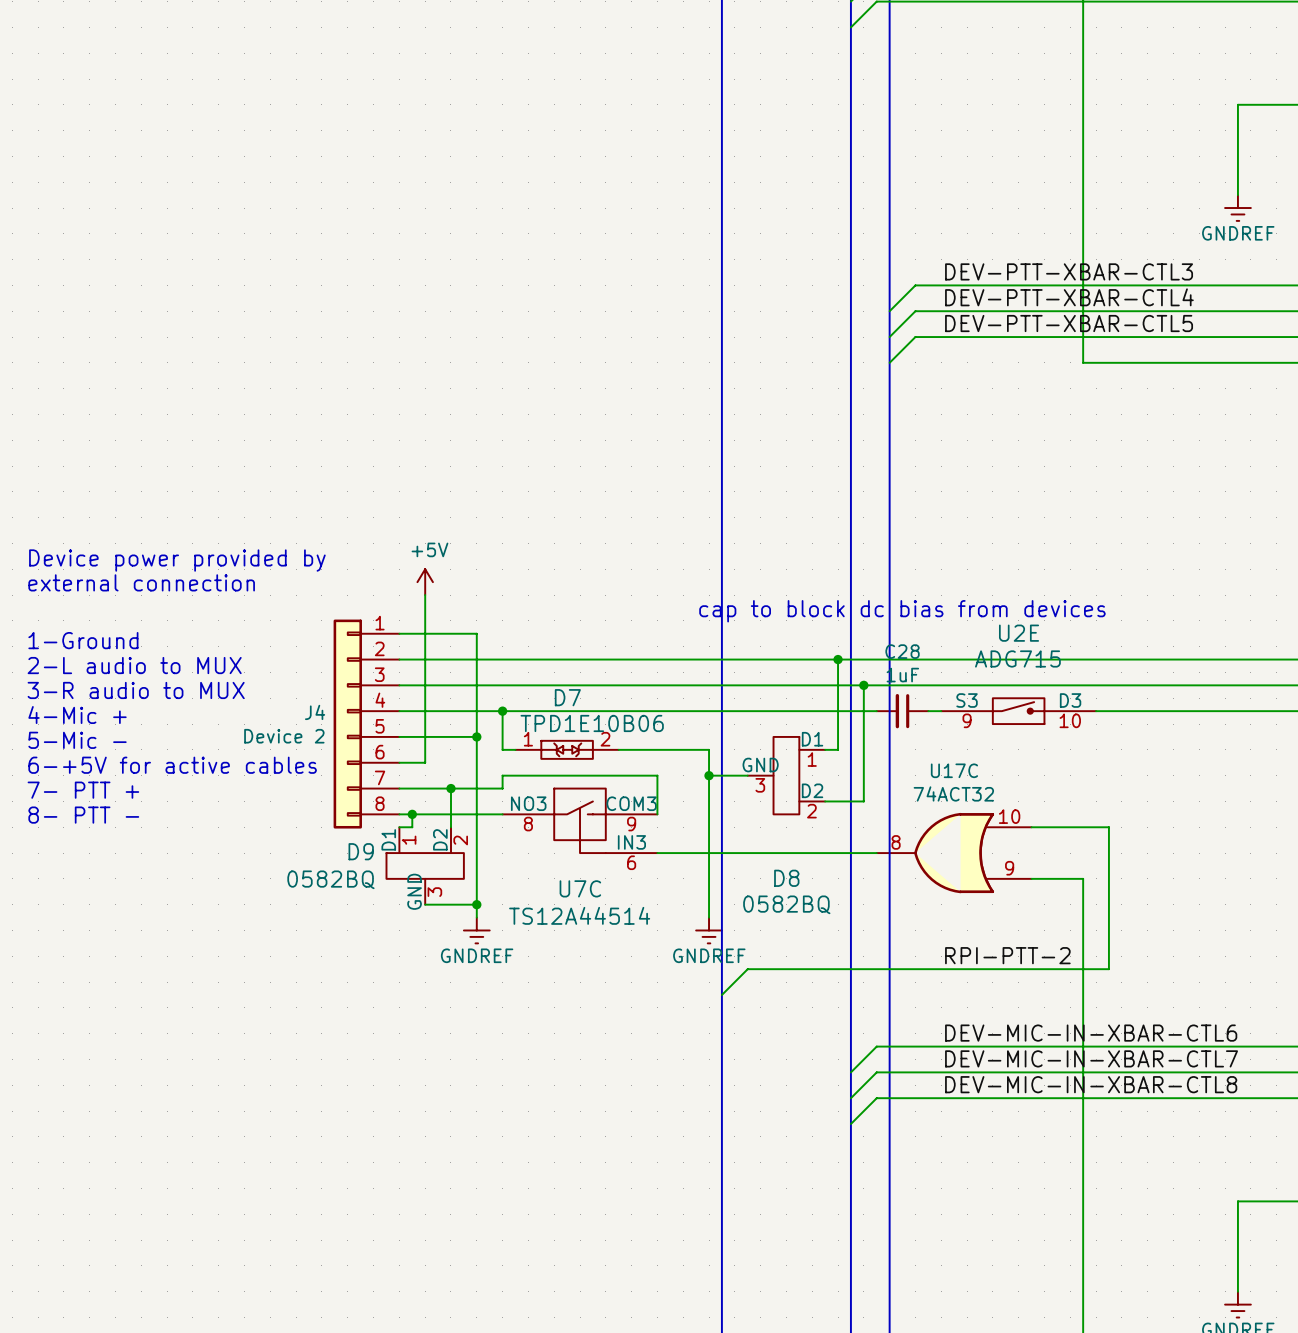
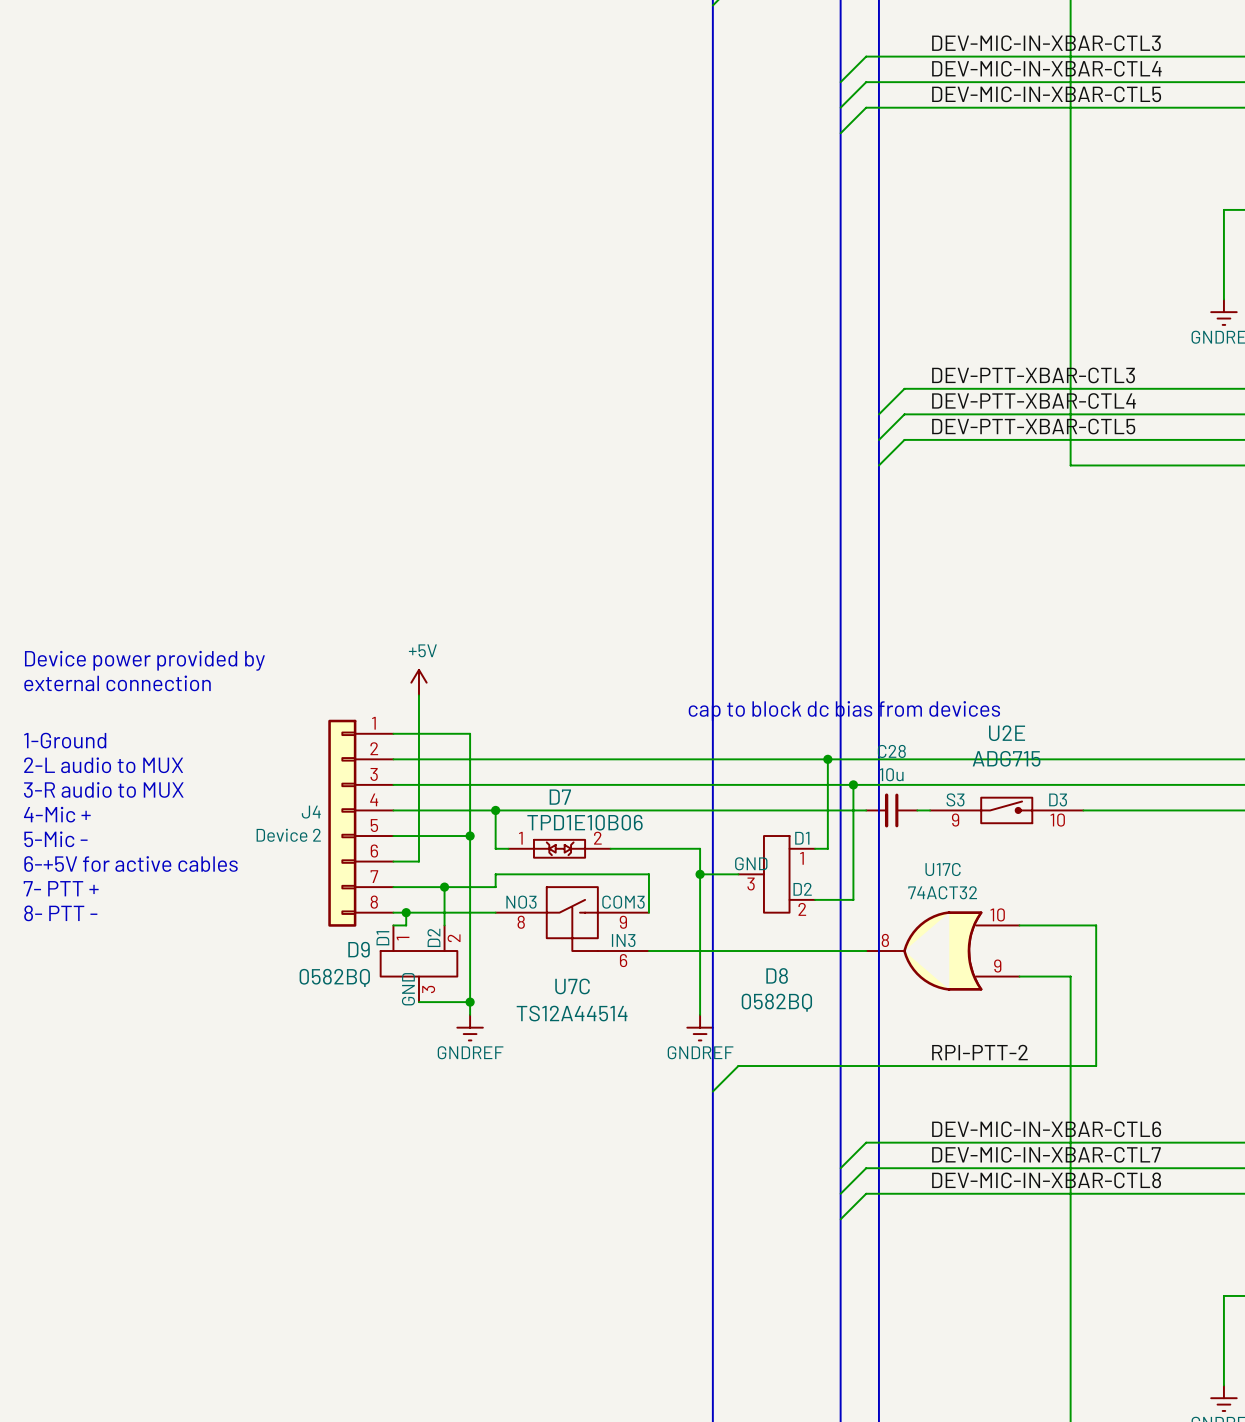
C28 value: 1uF (902, 675) -> 10u (891, 774)

